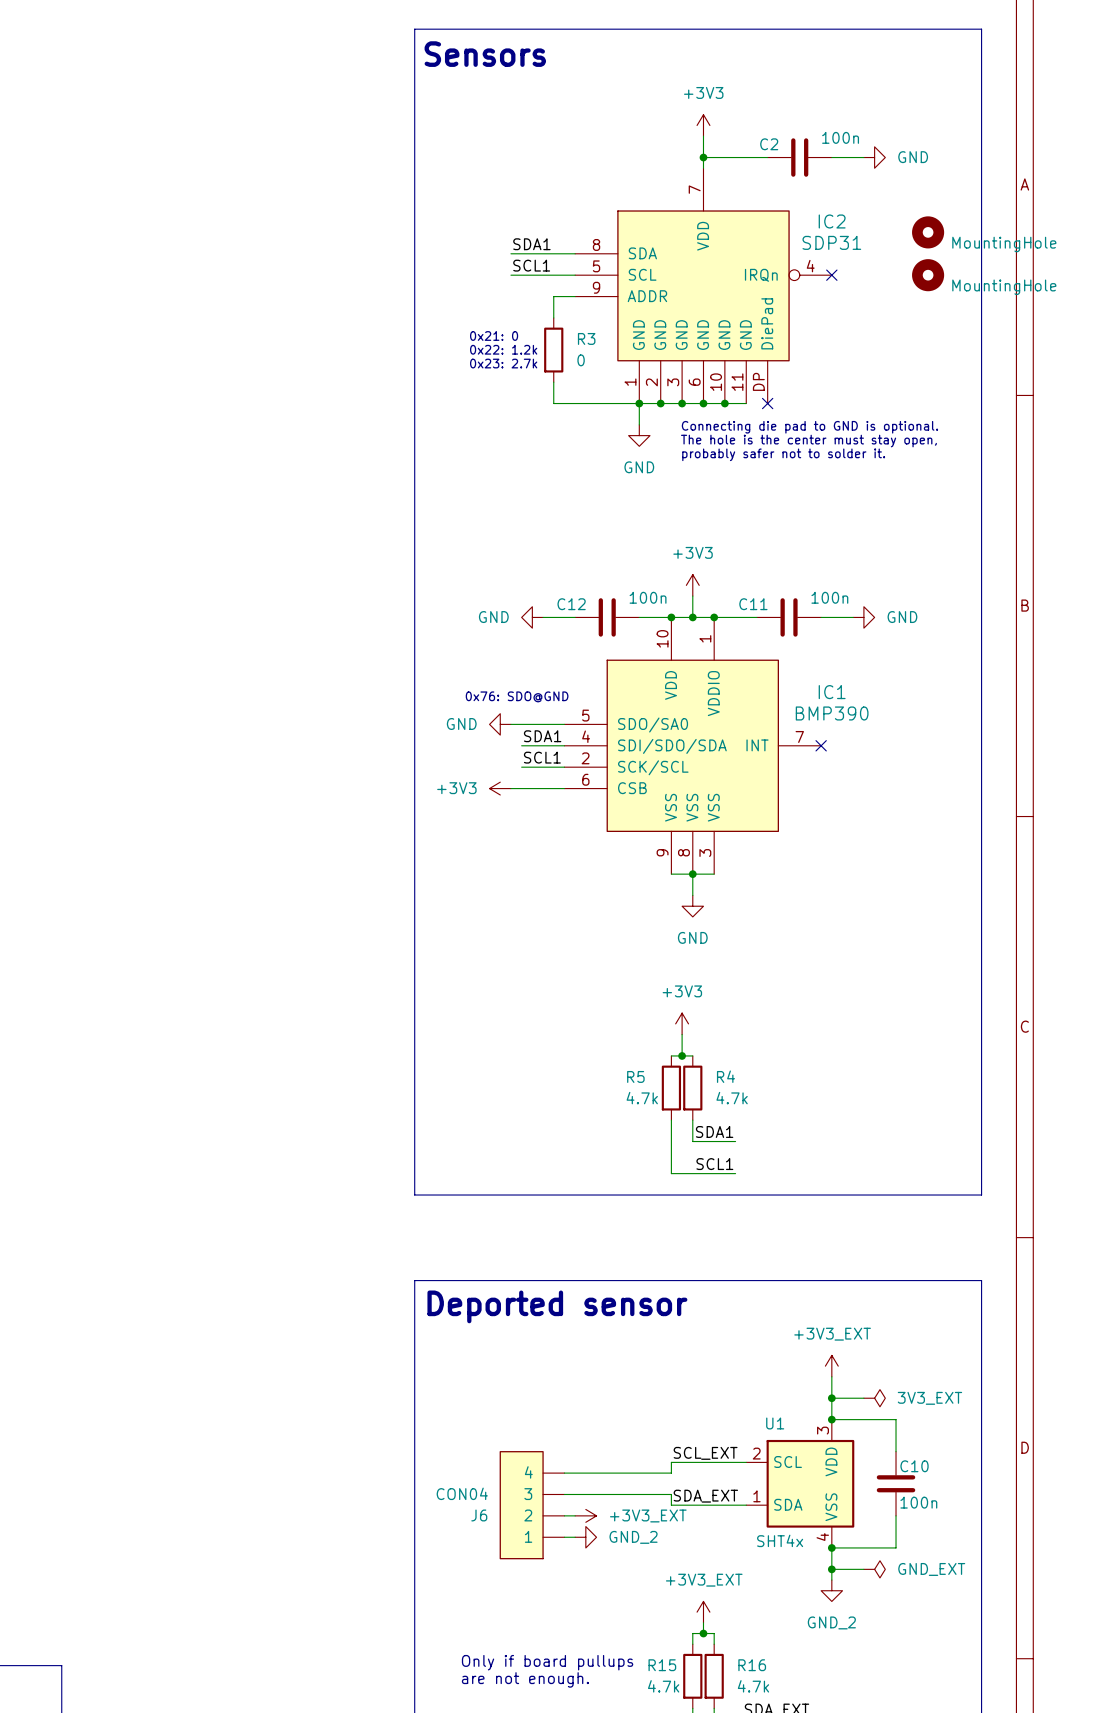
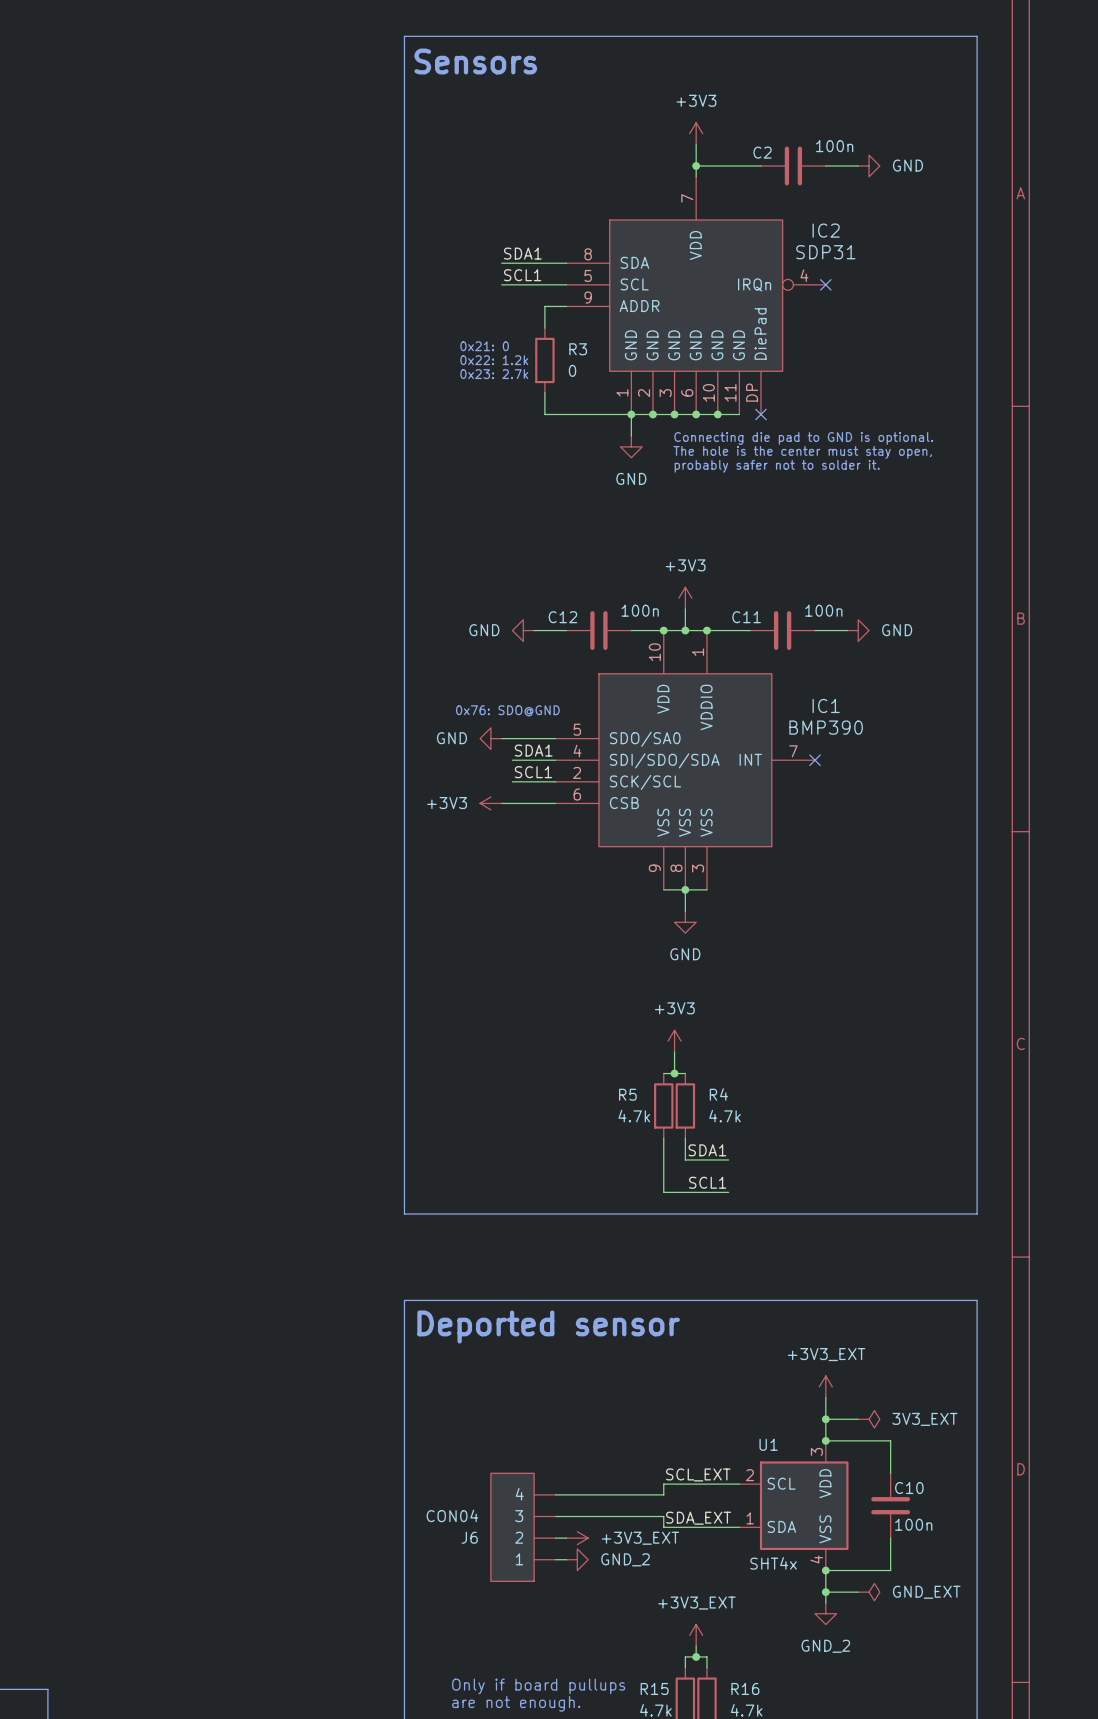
part: MountingHole (928, 232) -> none
part: MountingHole (928, 275) -> none

